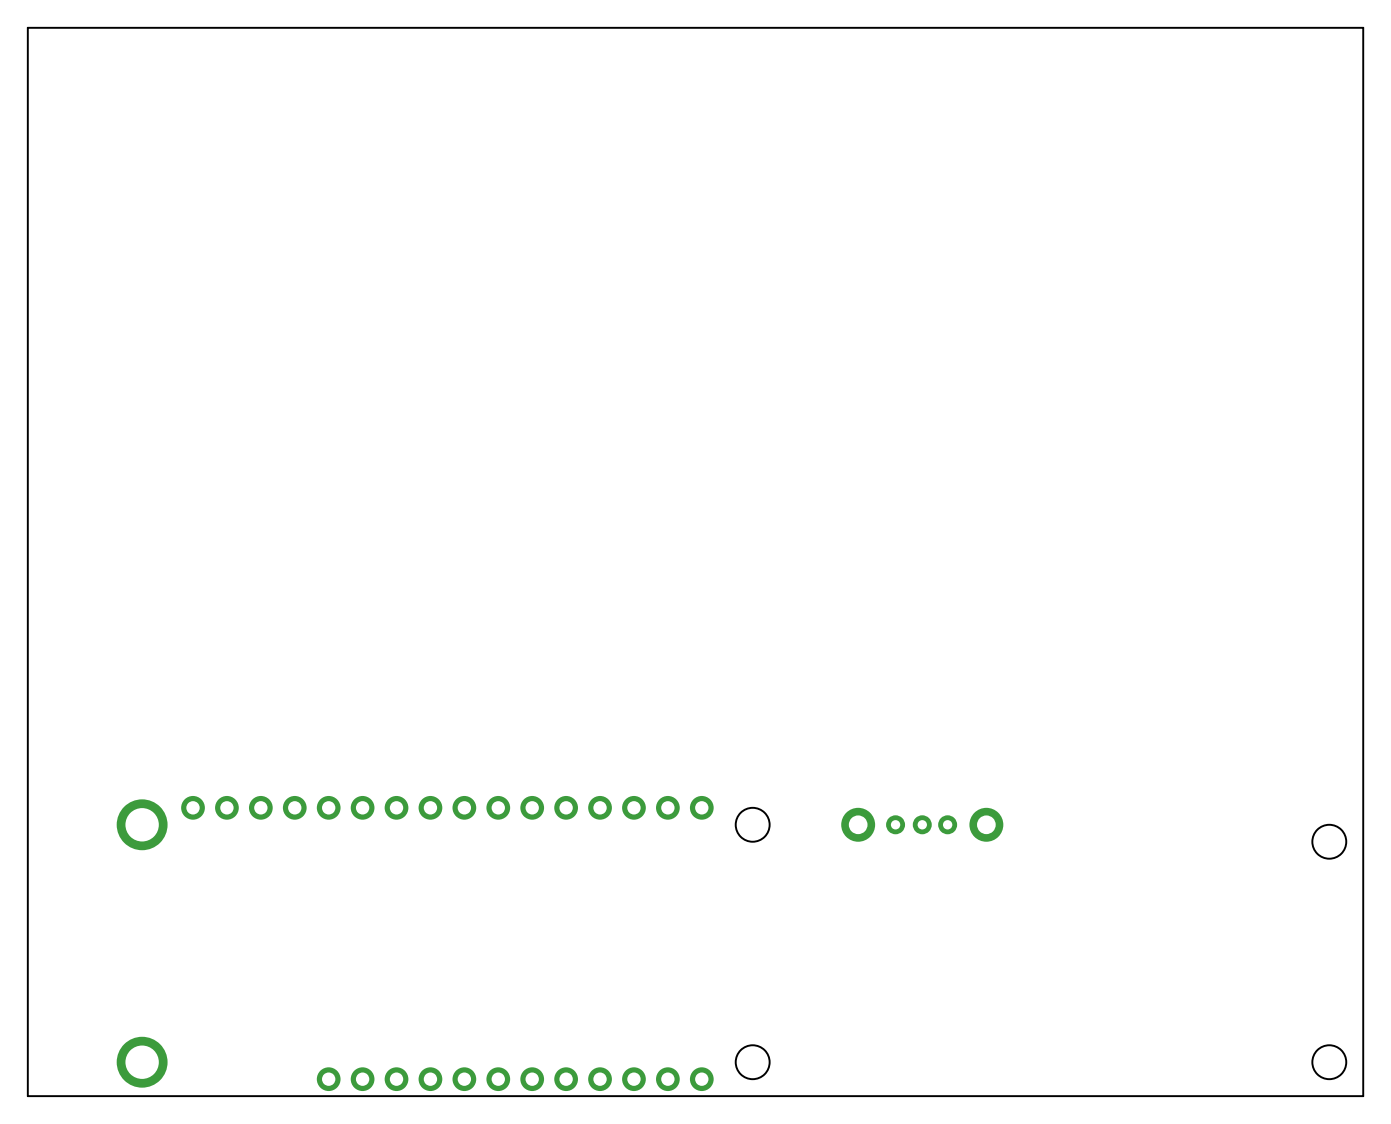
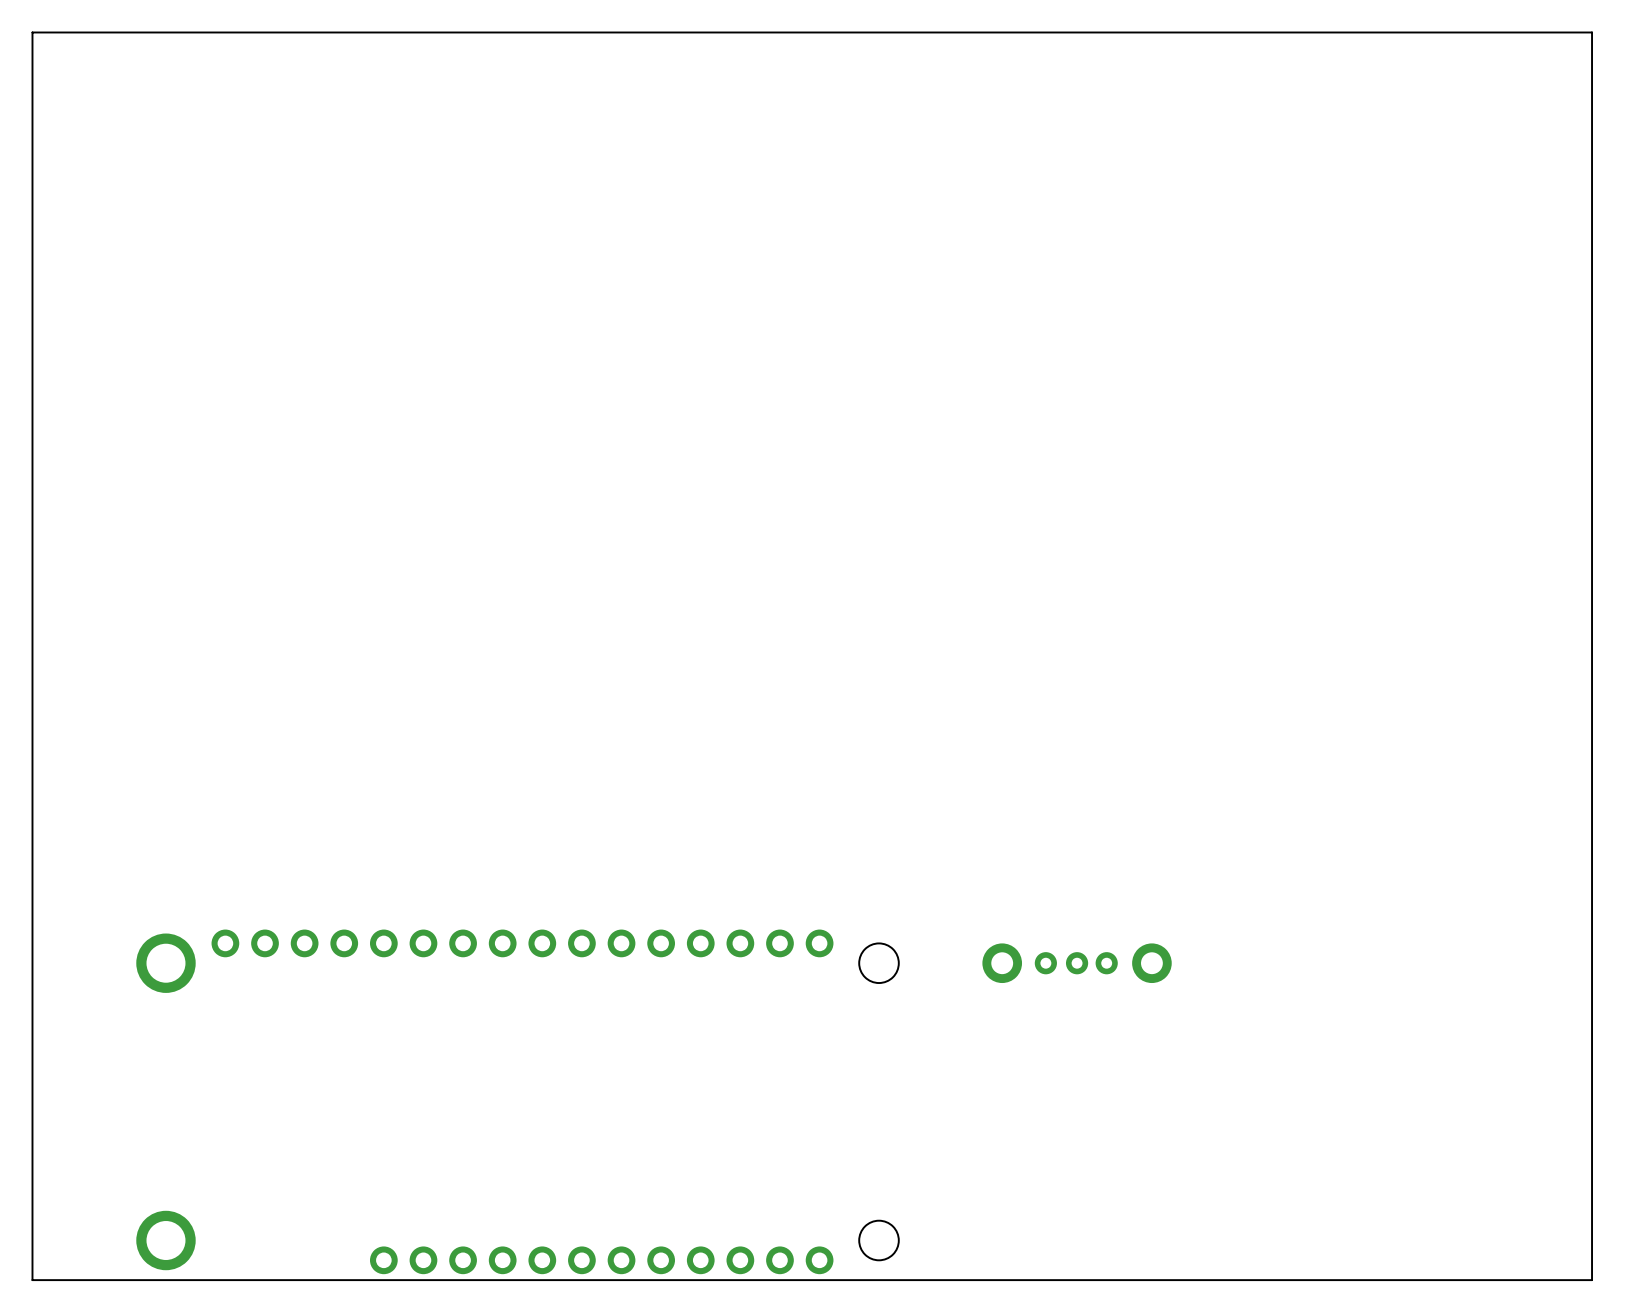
round board edge: [1312, 824, 1347, 859] -> none
round board edge: [1312, 1045, 1347, 1080] -> none

